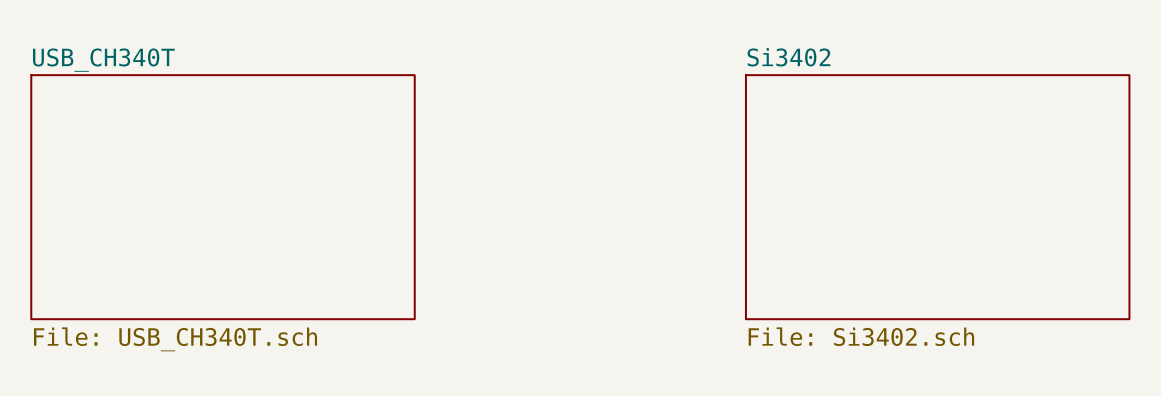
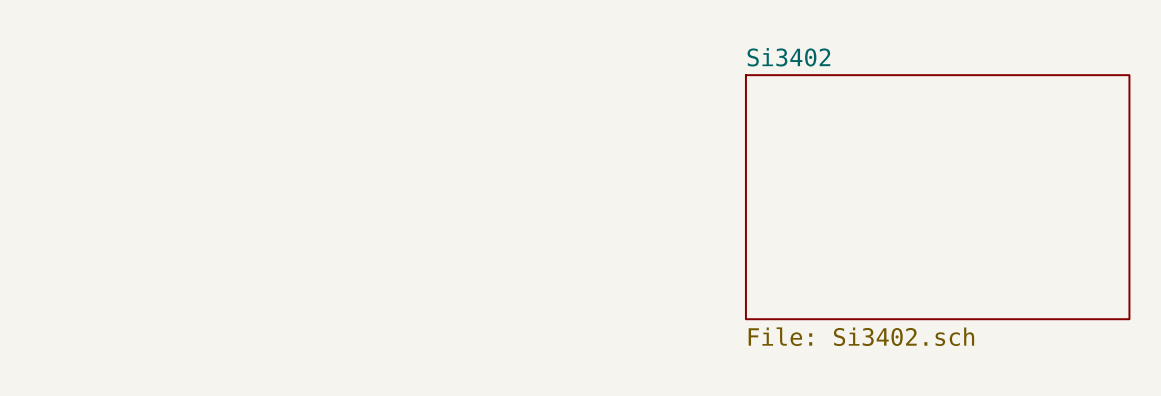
sheet USB_CH340T: File: USB_CH340T.sch (223, 197) -> none

